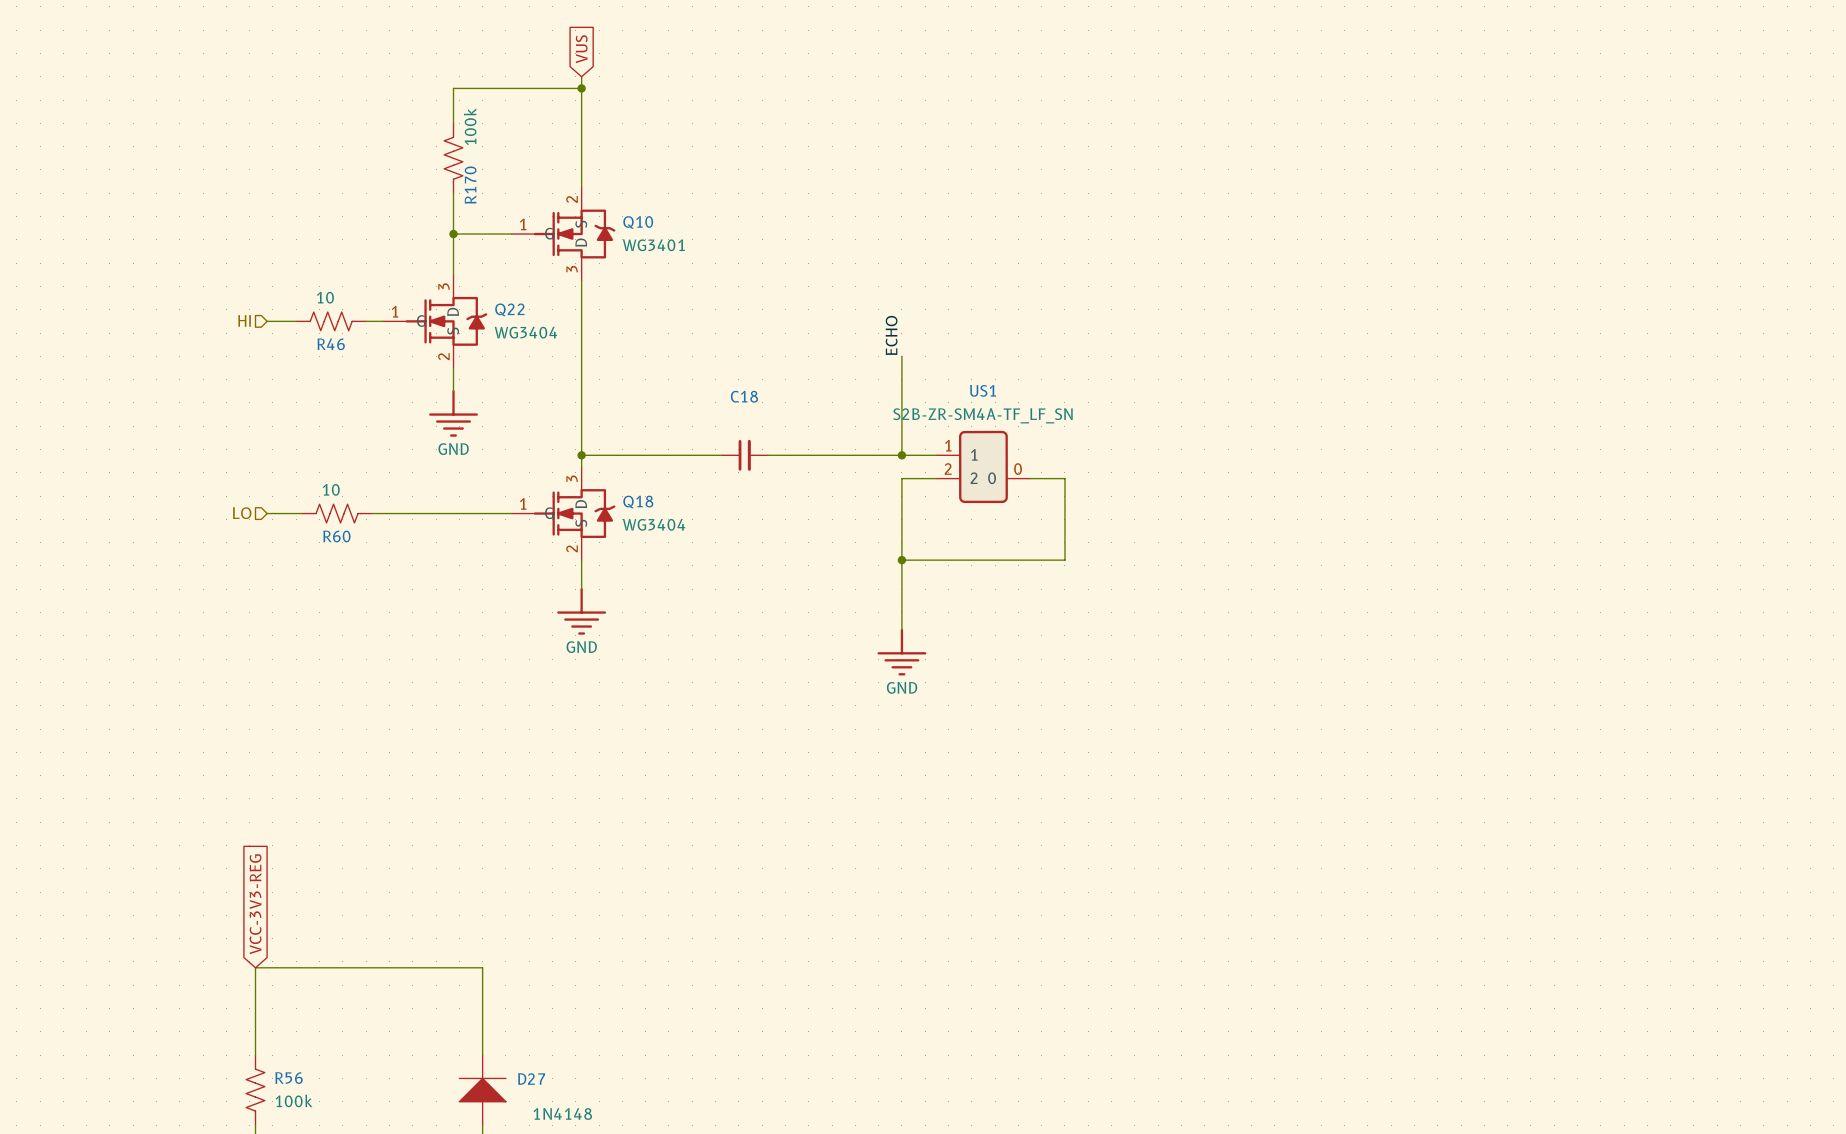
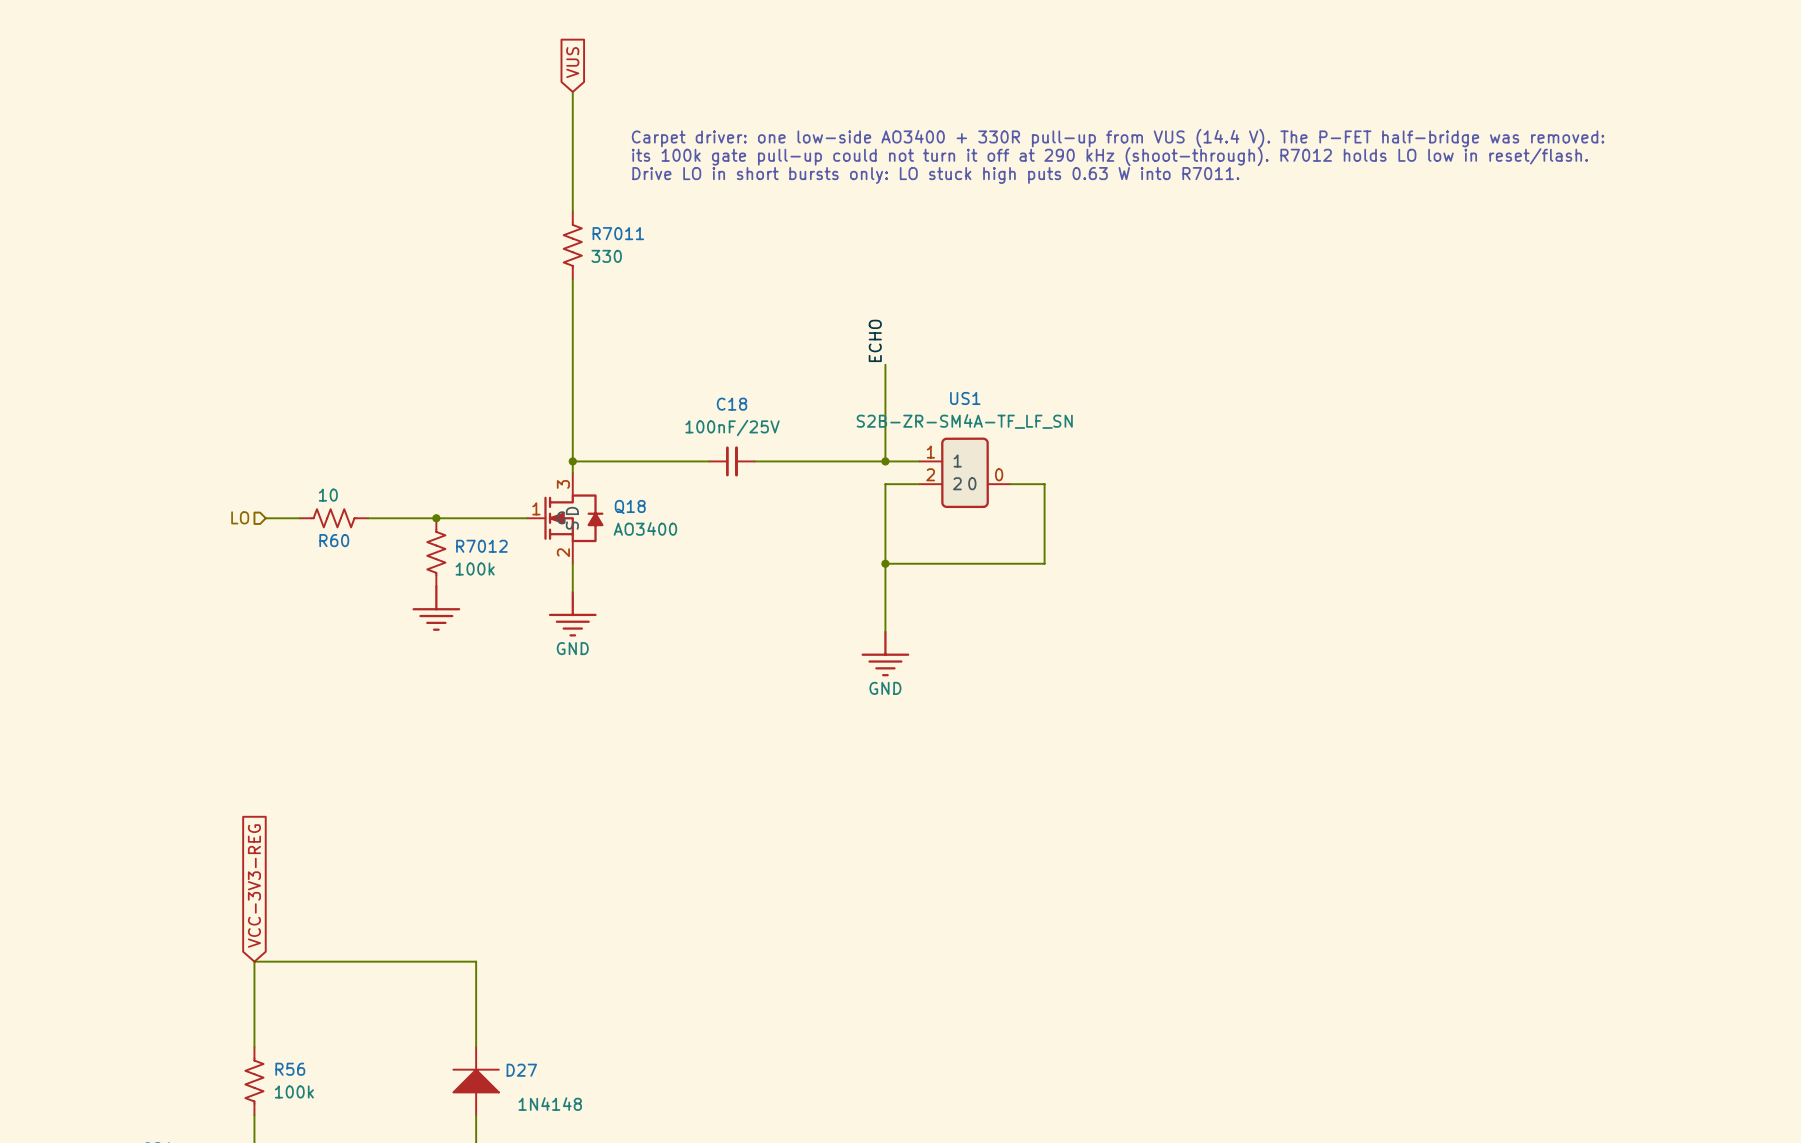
wire: (581, 88) (453, 88) (453, 123) -> none
junction: (581, 88) -> none
text: none -> Carpet driver: one low-side AO3400 + 330R pull-up from VUS (14.4 V). The P-FET half-bridge was removed: (1118, 138)
text: none -> its 100k gate pull-up could not turn it off at 290 kHz (shoot-through). R7012 holds LO low in reset/flash. (1109, 156)
R170: 100k (453, 158) -> none
text: none -> Drive LO in short bursts only: LO stuck high puts 0.63 W into R7011. (935, 175)
wire: (453, 193) (453, 274) -> none
wire: (453, 234) (511, 234) -> none
junction: (453, 234) -> none
Q10: WG3401 (563, 234) -> none
R7011: none -> 330 (572, 245)
hierarchical label: HI (244, 320) -> none
wire: (267, 321) (296, 321) -> none
R46: 10 (331, 321) -> none
wire: (366, 321) (383, 321) -> none
Q22: WG3404 (435, 321) -> none
wire: (453, 367) (453, 391) -> none
power symbol: GND (453, 413) -> none
C18 value: none -> 100nF/25V (732, 427)
Q18 symbol: [511, 466, 616, 561] -> [527, 472, 604, 564]
junction: none -> (436, 518)
Q18 value: WG3404 (654, 524) -> AO3400 (645, 528)
R7012: none -> 100k (436, 552)
power symbol: none -> (436, 608)

